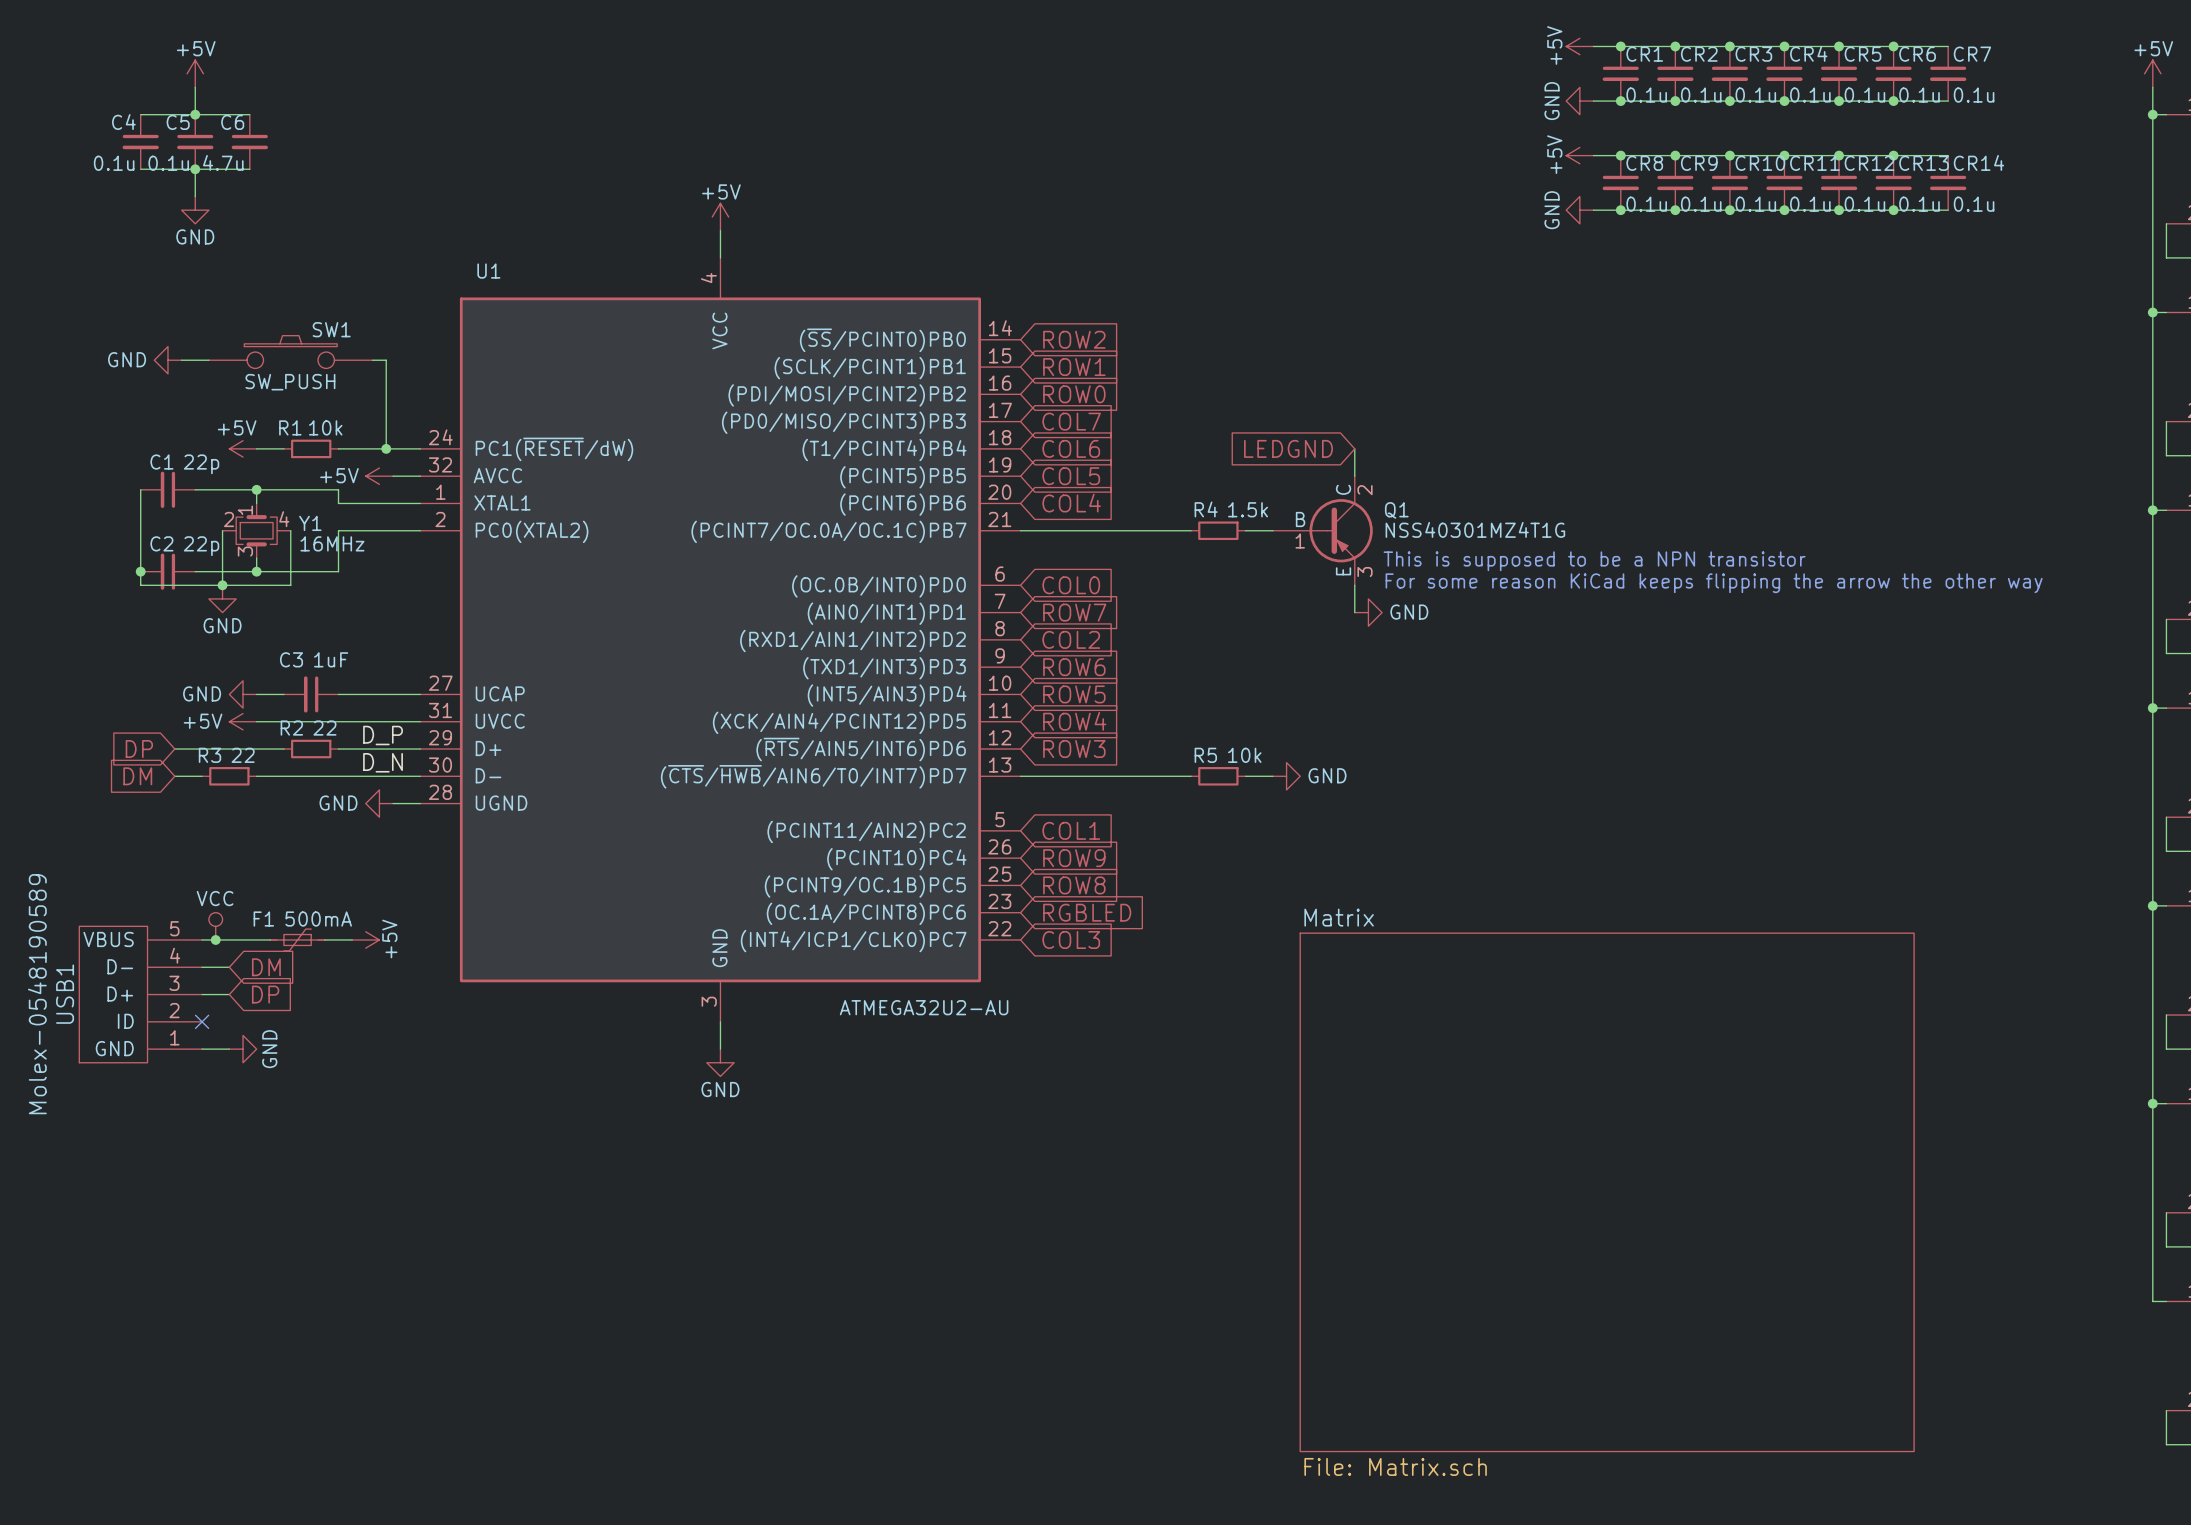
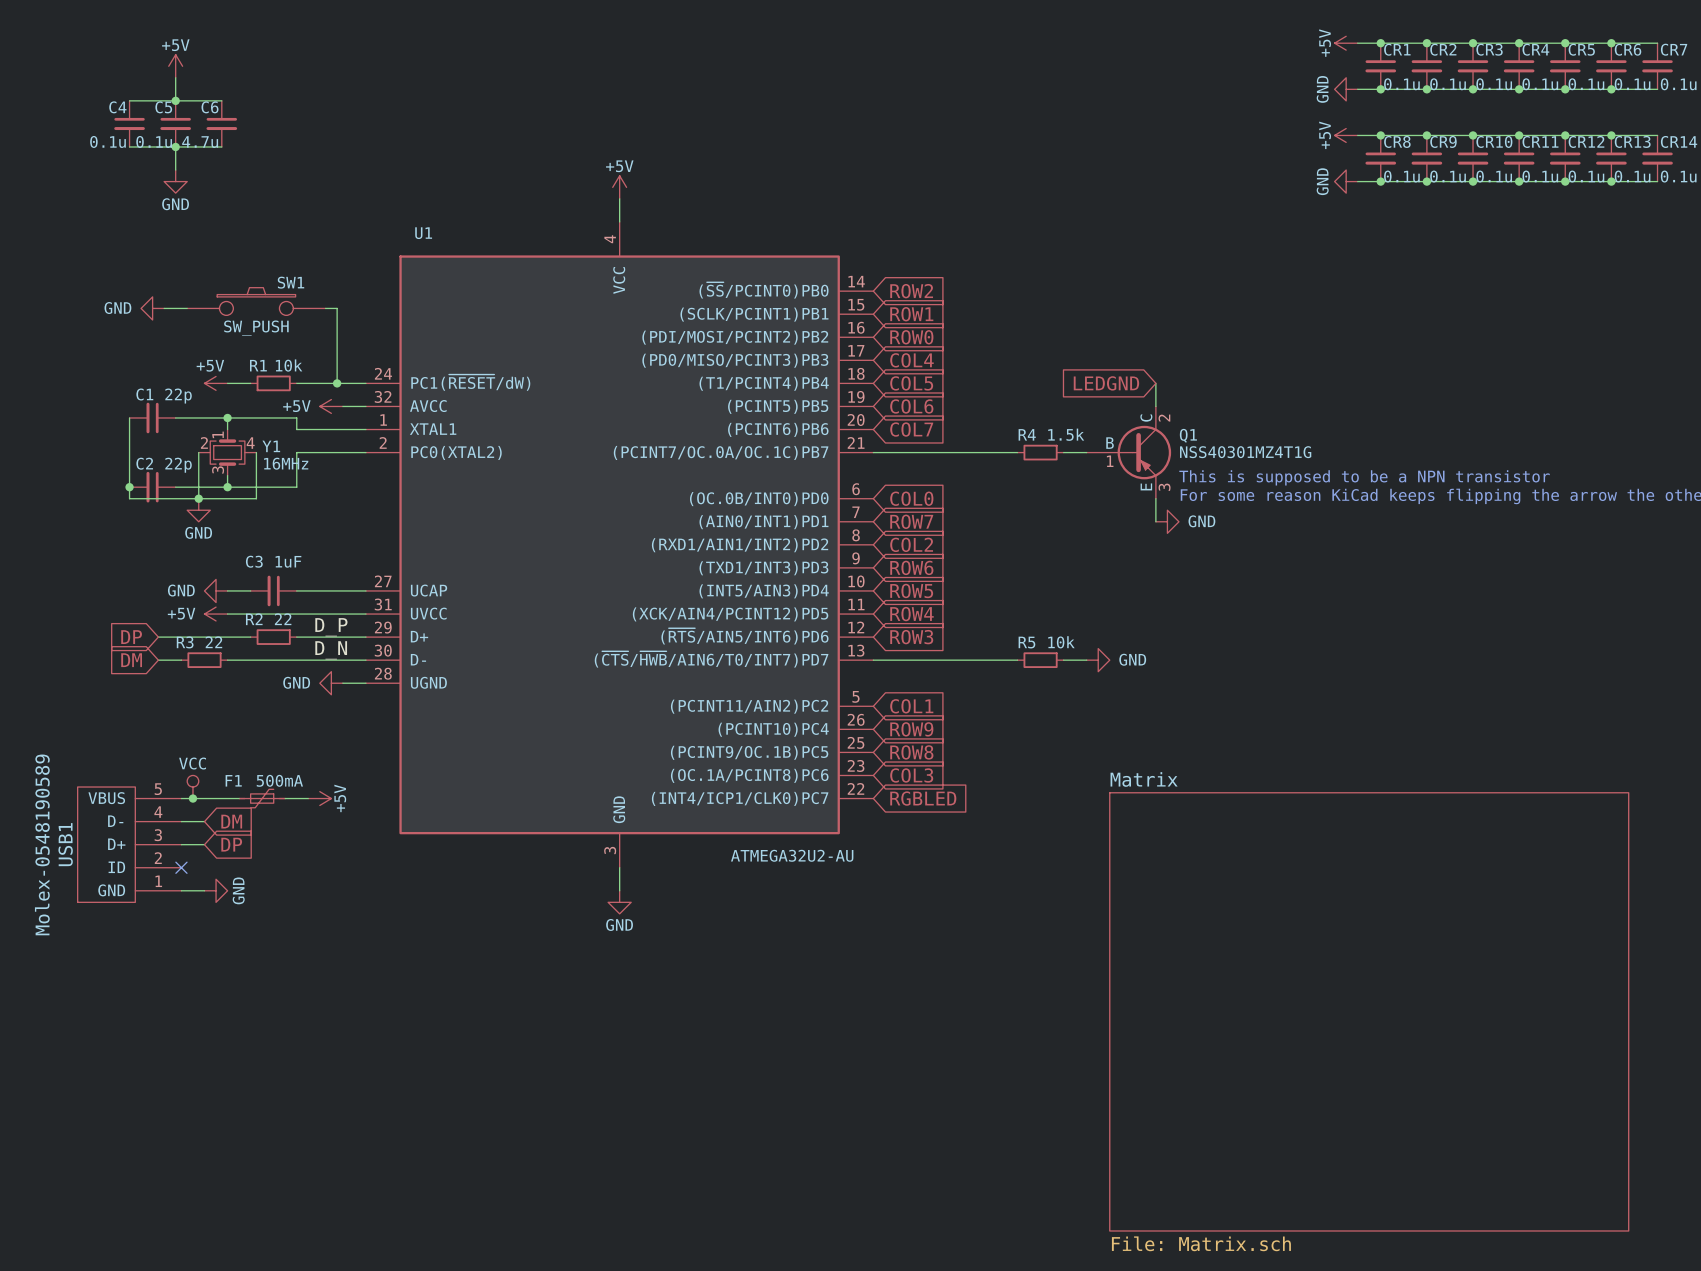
global label: COL7 (1071, 421) -> COL4 (911, 360)
global label: COL6 (1071, 448) -> COL5 (911, 383)
global label: COL5 (1071, 476) -> COL6 (911, 406)
global label: COL4 (1071, 503) -> COL7 (911, 429)
global label: RGBLED (1087, 912) -> COL3 (911, 775)
global label: COL3 (1071, 939) -> RGBLED (923, 798)

